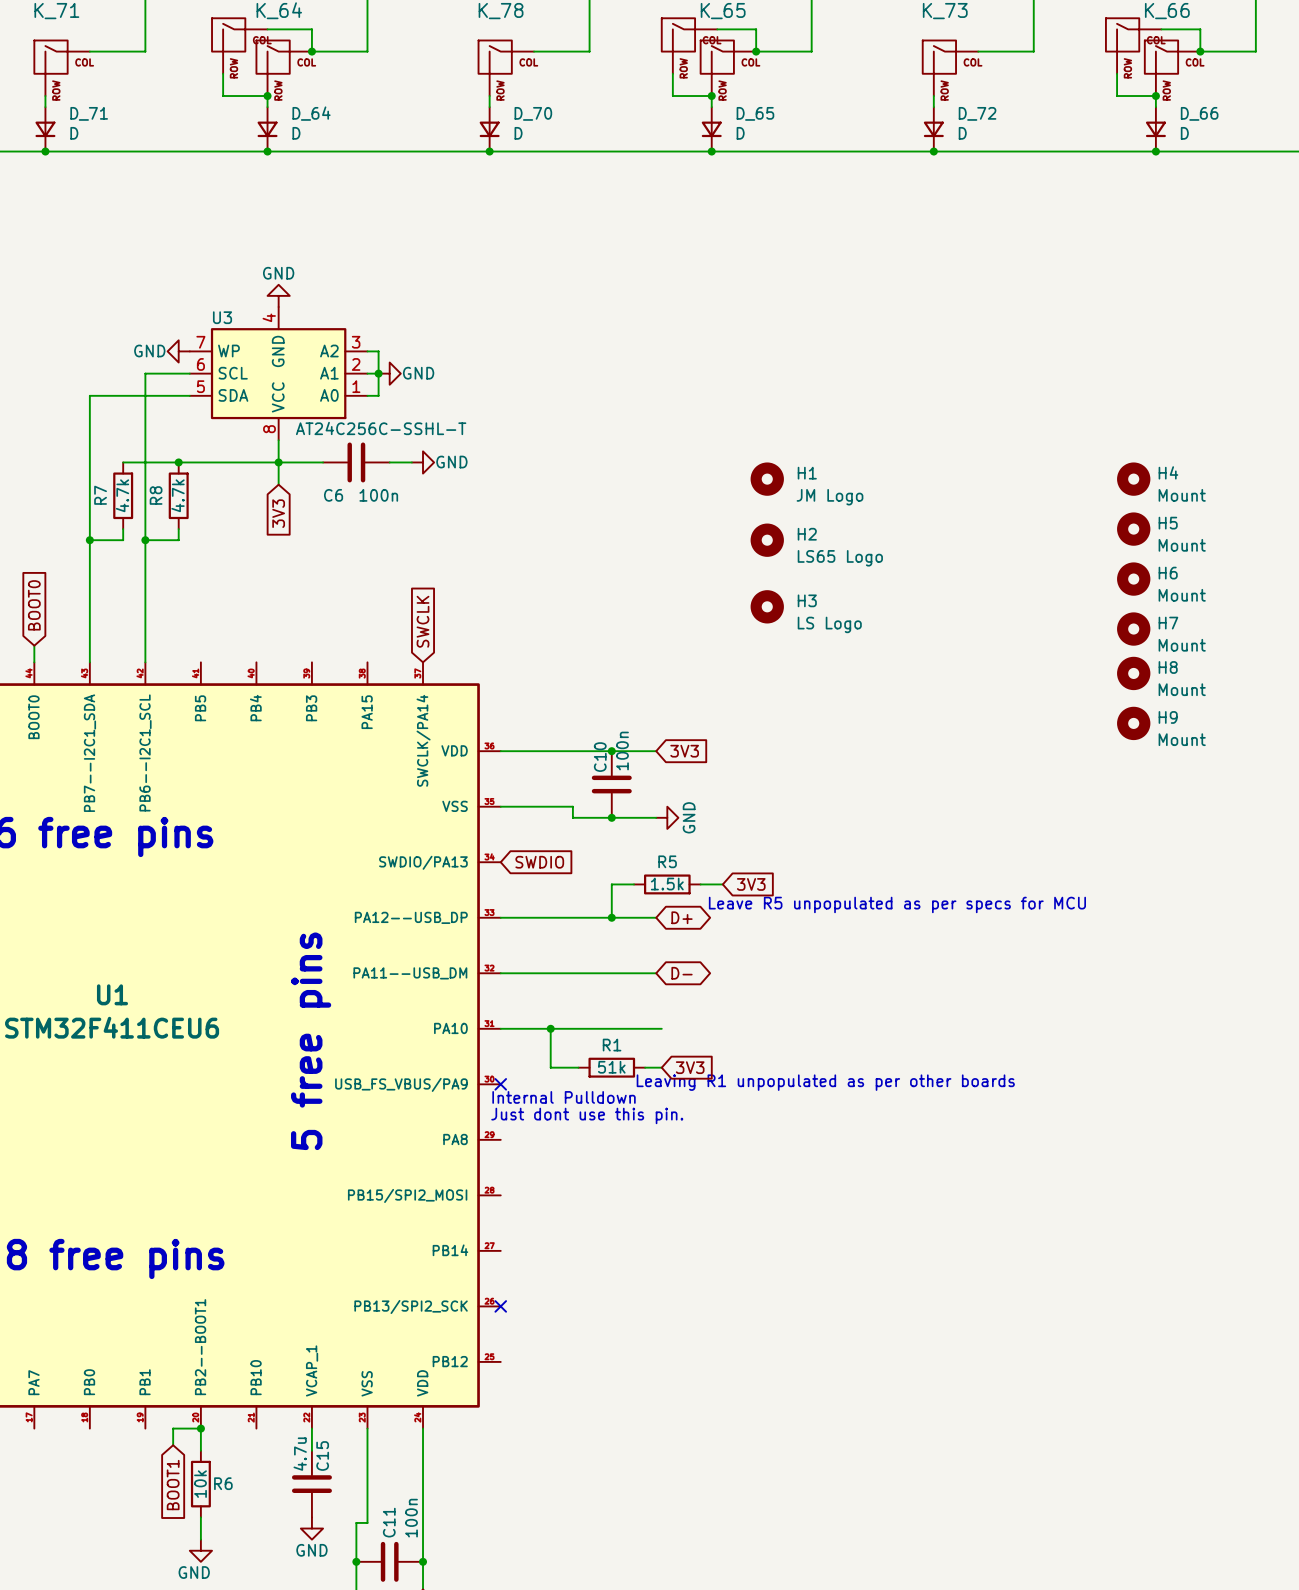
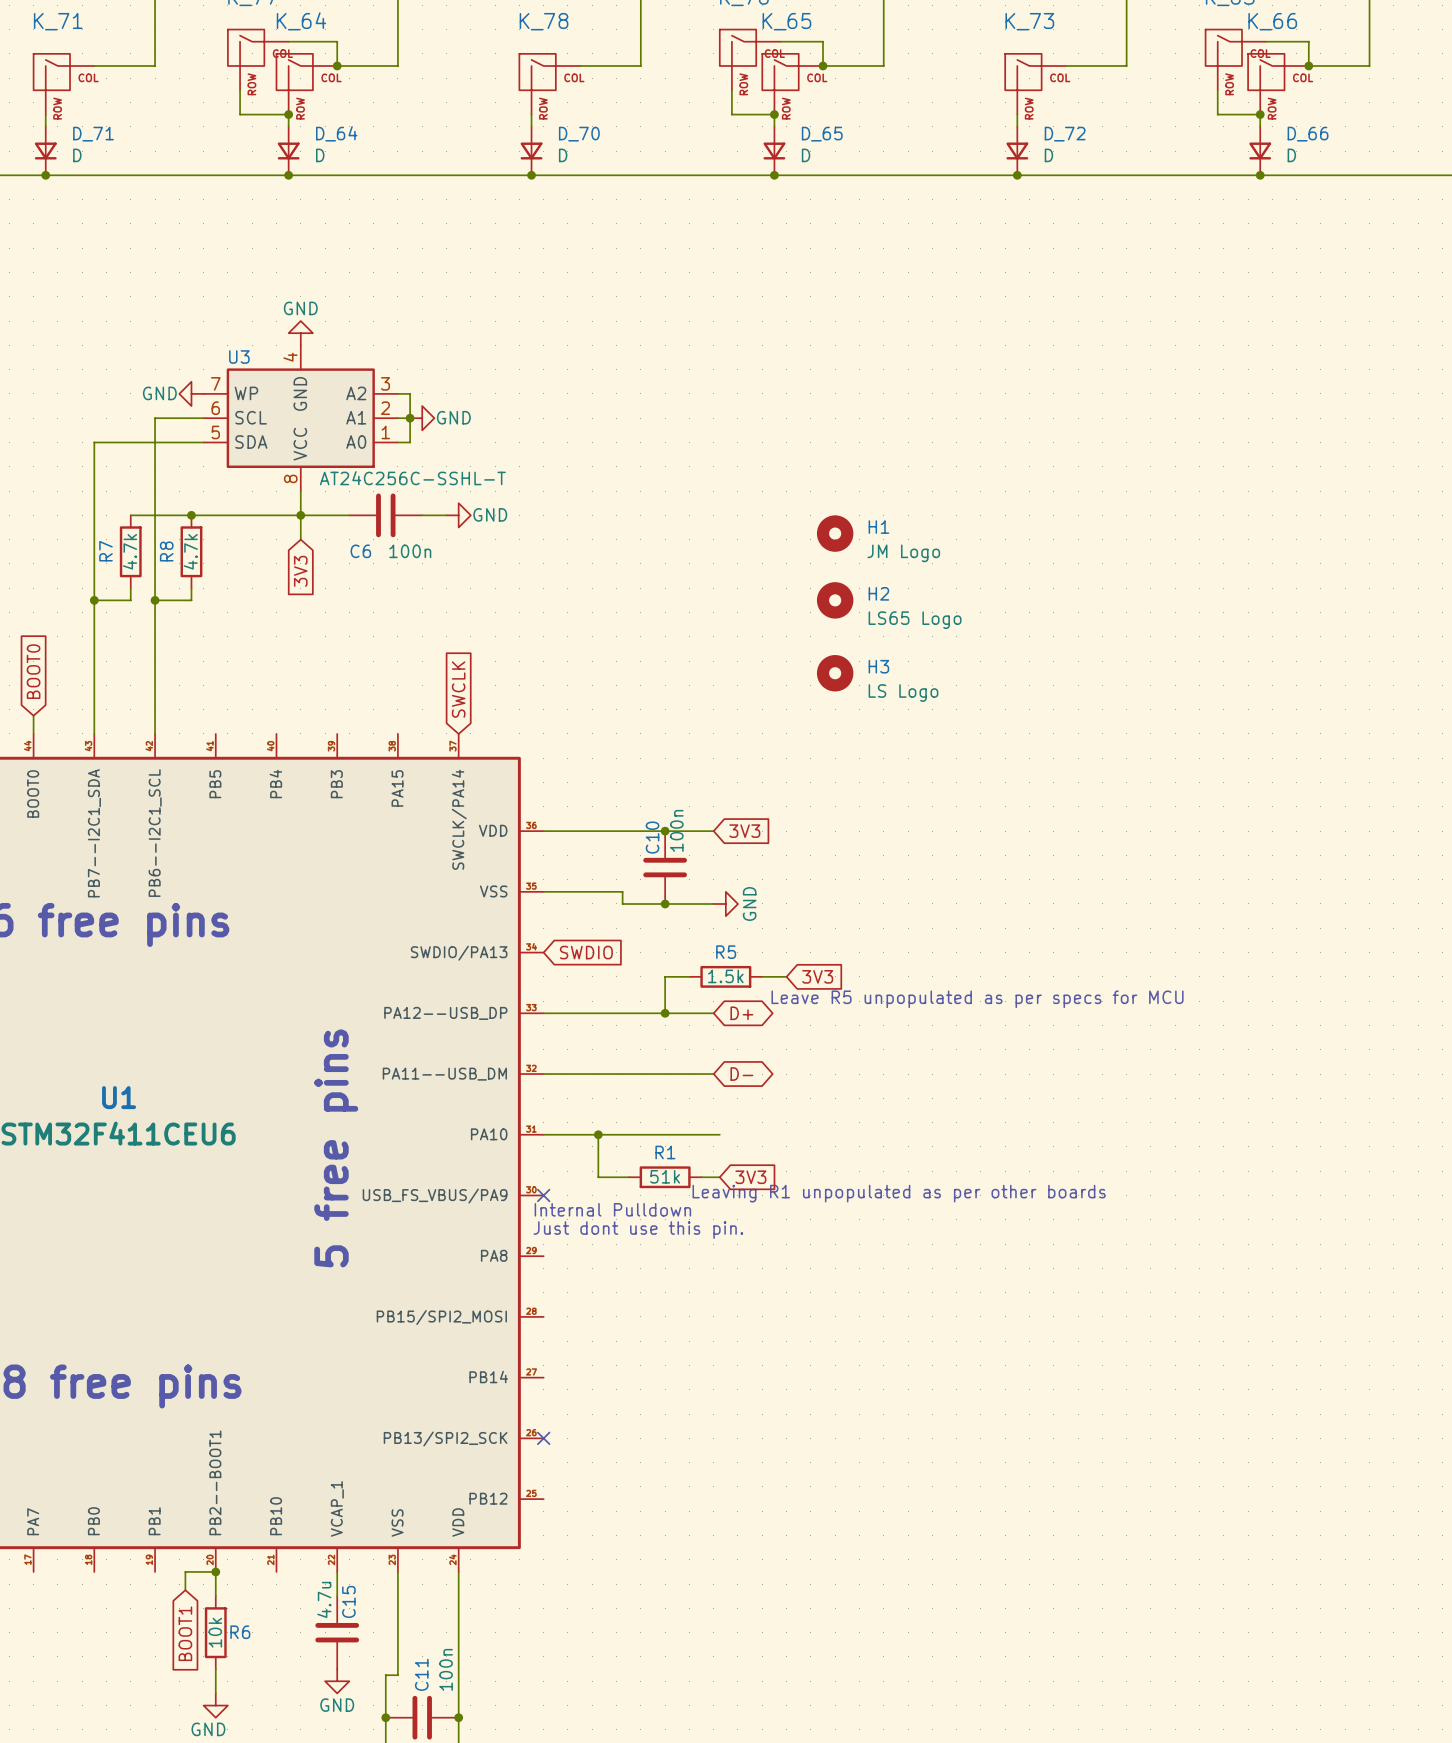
H4: Mount (1133, 479) -> none
H5: Mount (1133, 529) -> none
H6: Mount (1133, 579) -> none
H7: Mount (1133, 629) -> none
H8: Mount (1133, 673) -> none
H9: Mount (1133, 723) -> none

